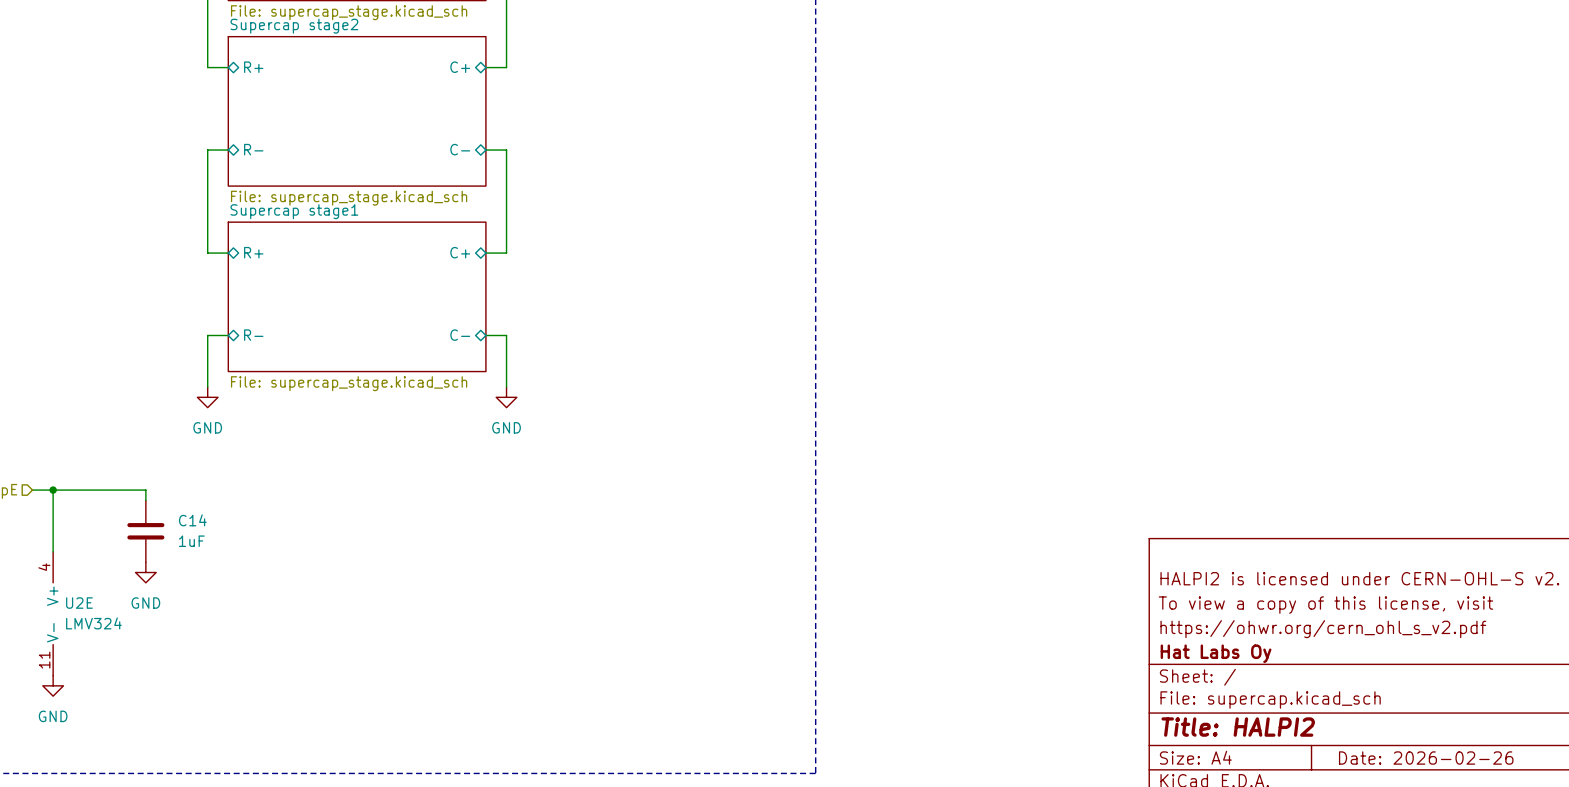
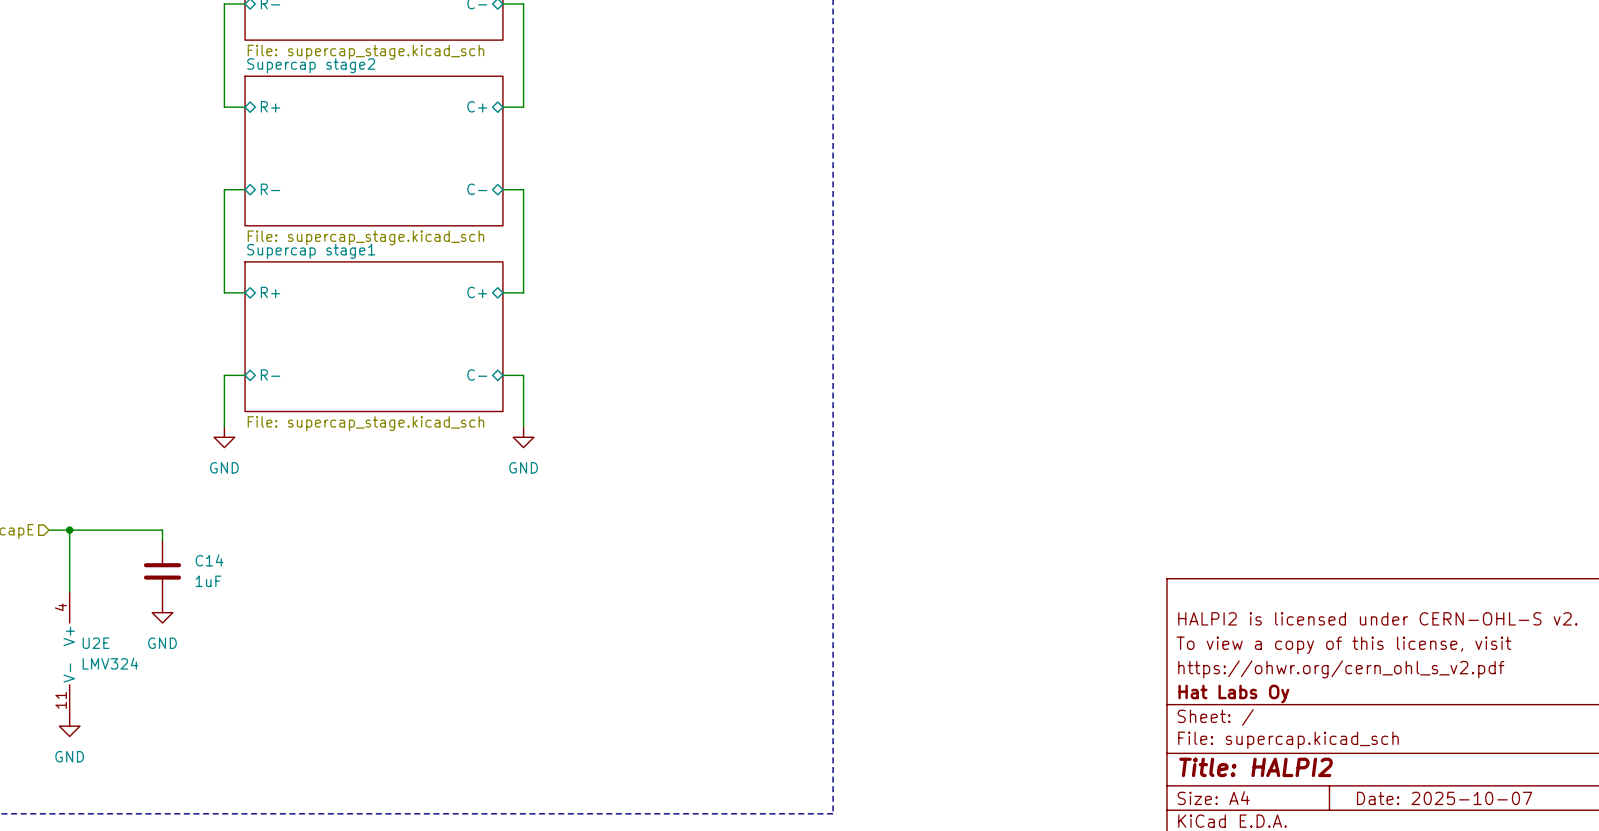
title block: Date: 2026-02-26 (1426, 758) -> Date: 2025-10-07 (1444, 798)

